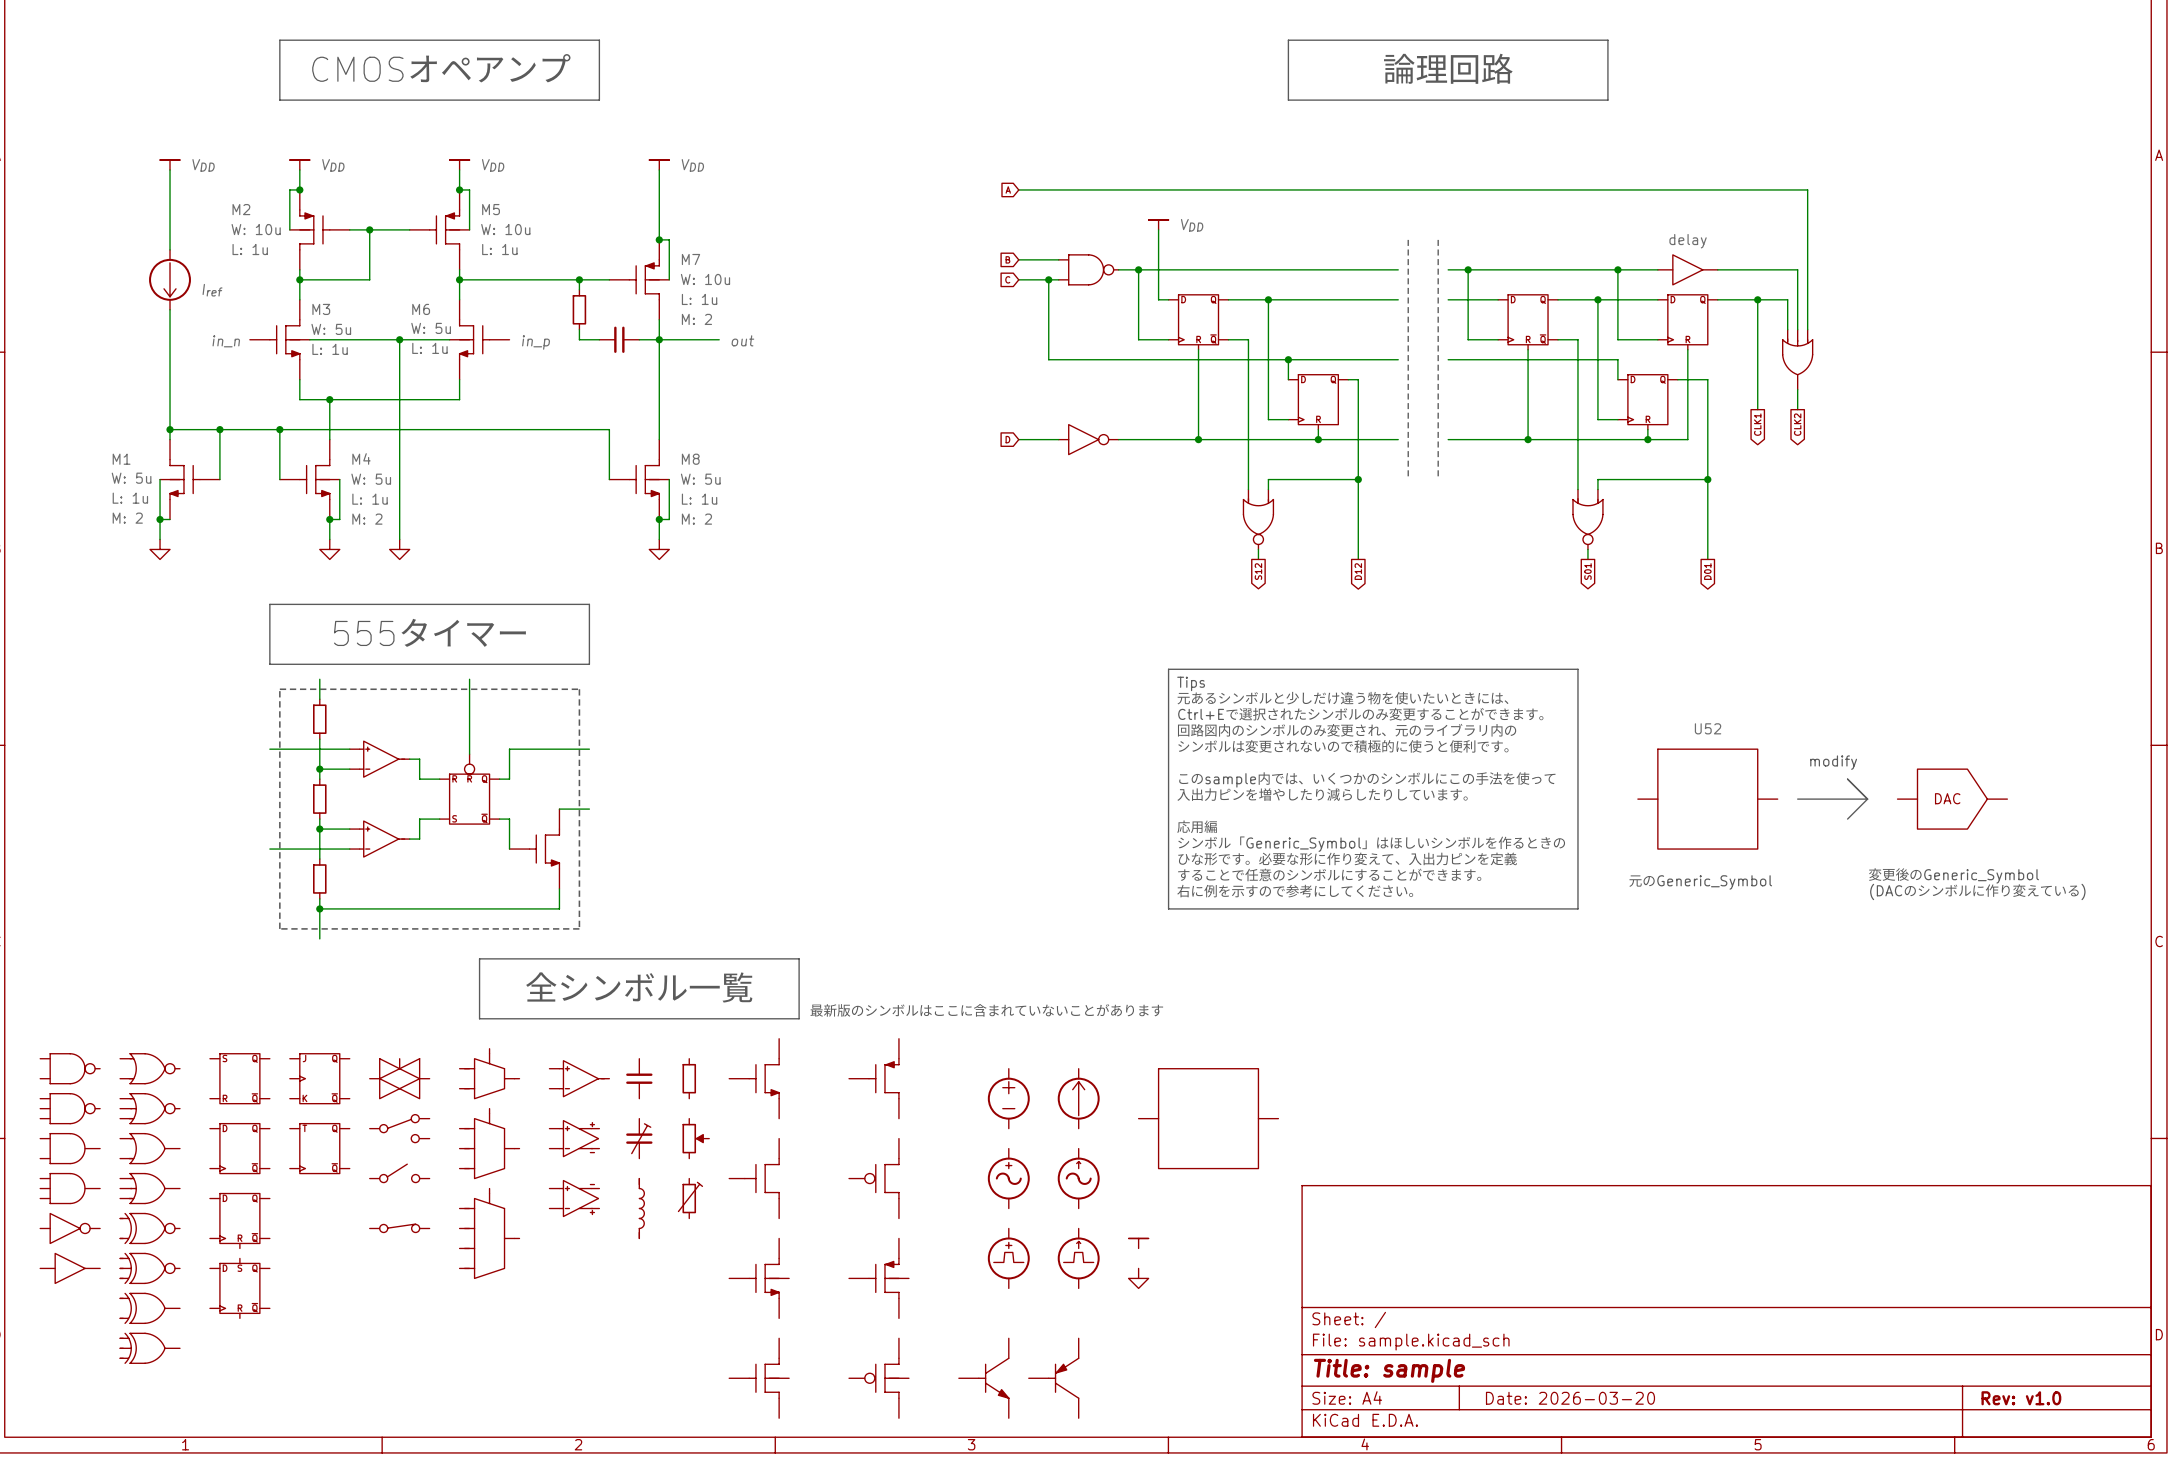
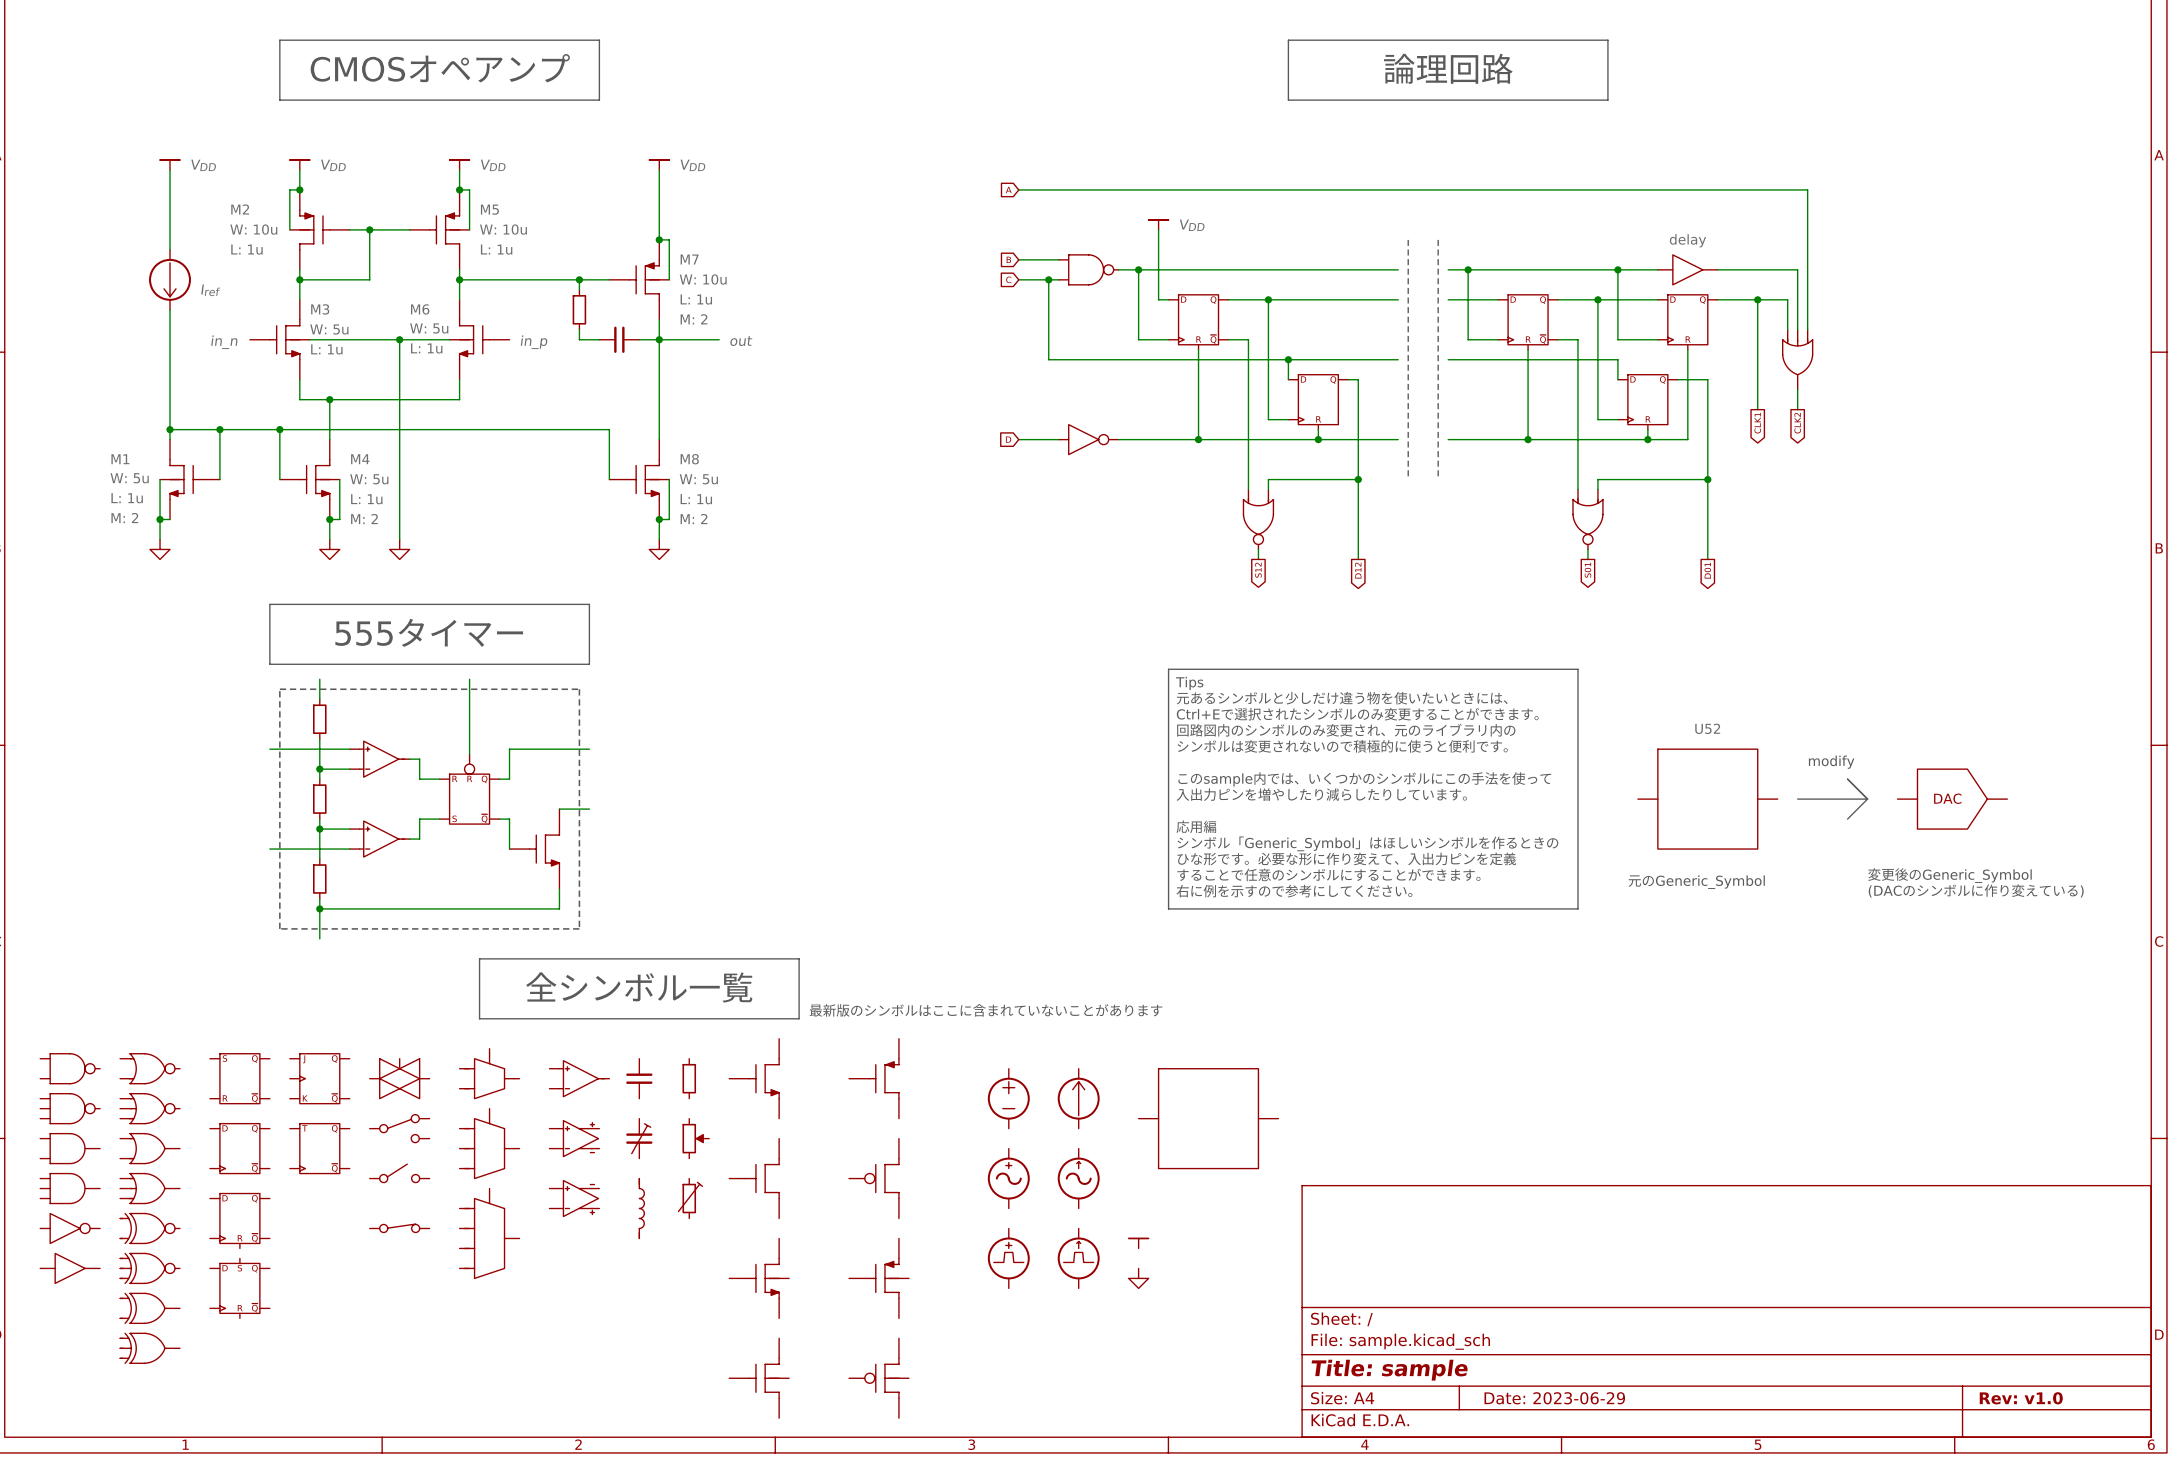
part: (983, 1378) -> none
part: (1053, 1378) -> none
title block: Date: 2026-03-20 (1570, 1398) -> Date: 2023-06-29 (1554, 1398)

